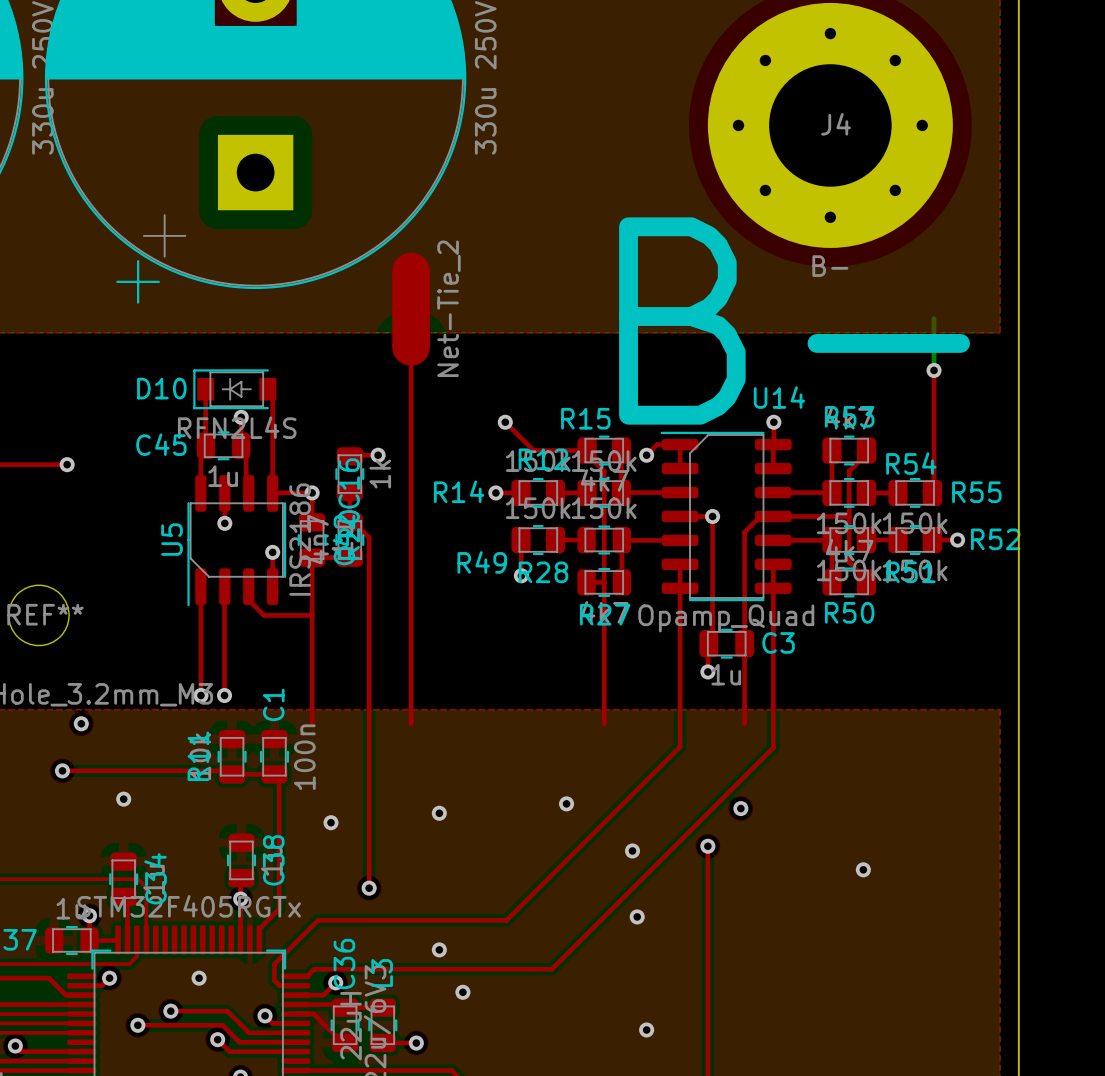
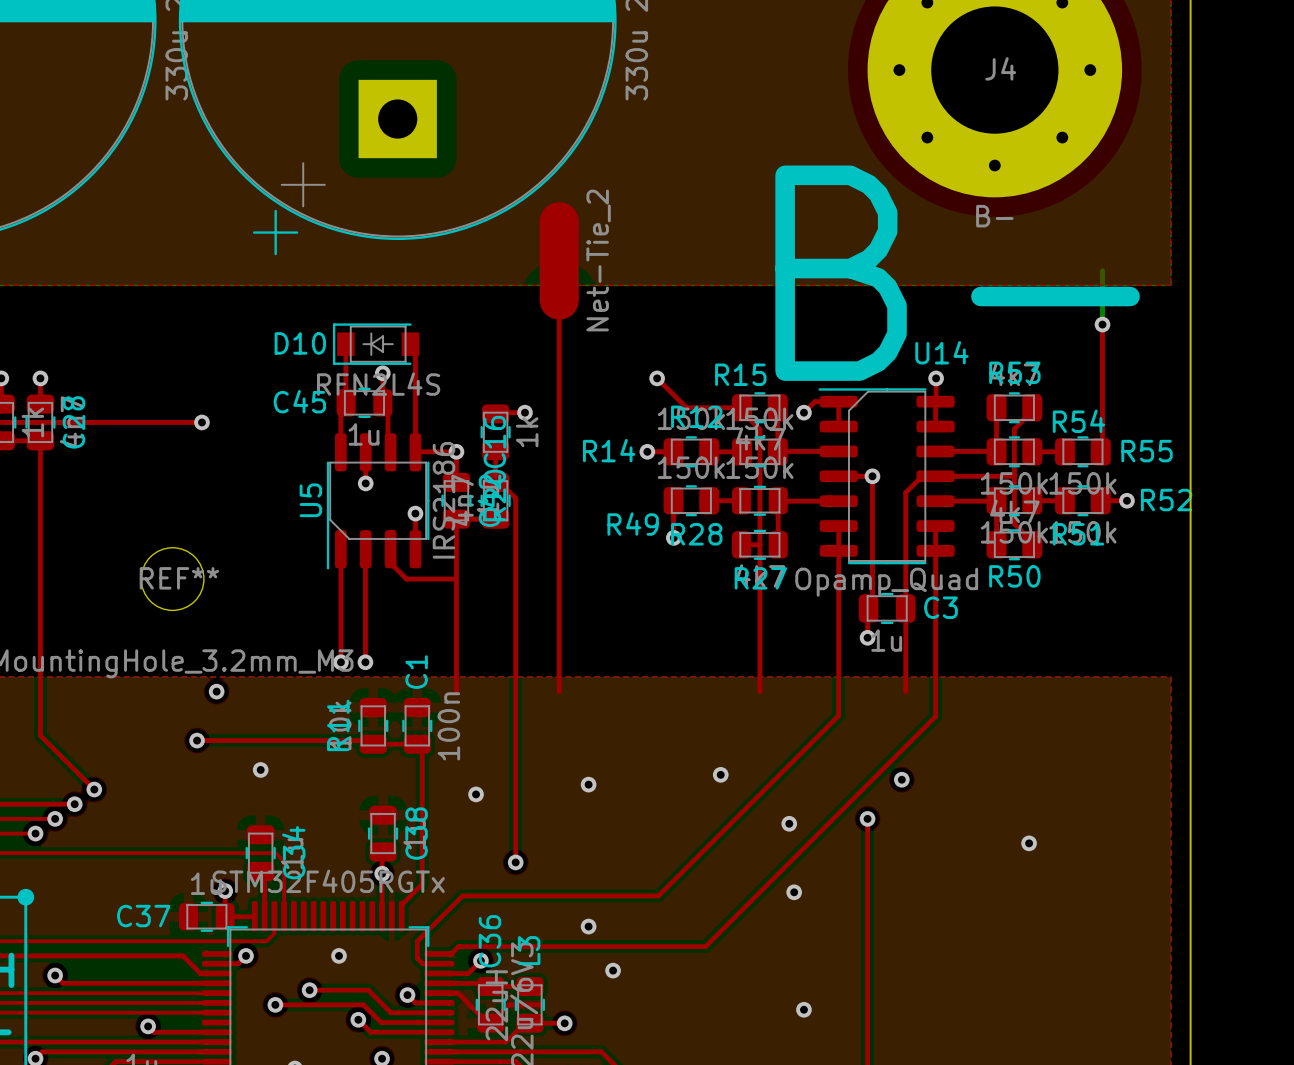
top track: none -> (539, 1004) (509, 1004) (490, 1023)
top track: none -> (529, 1023) (524, 1023) (506, 1042) (439, 1042)

